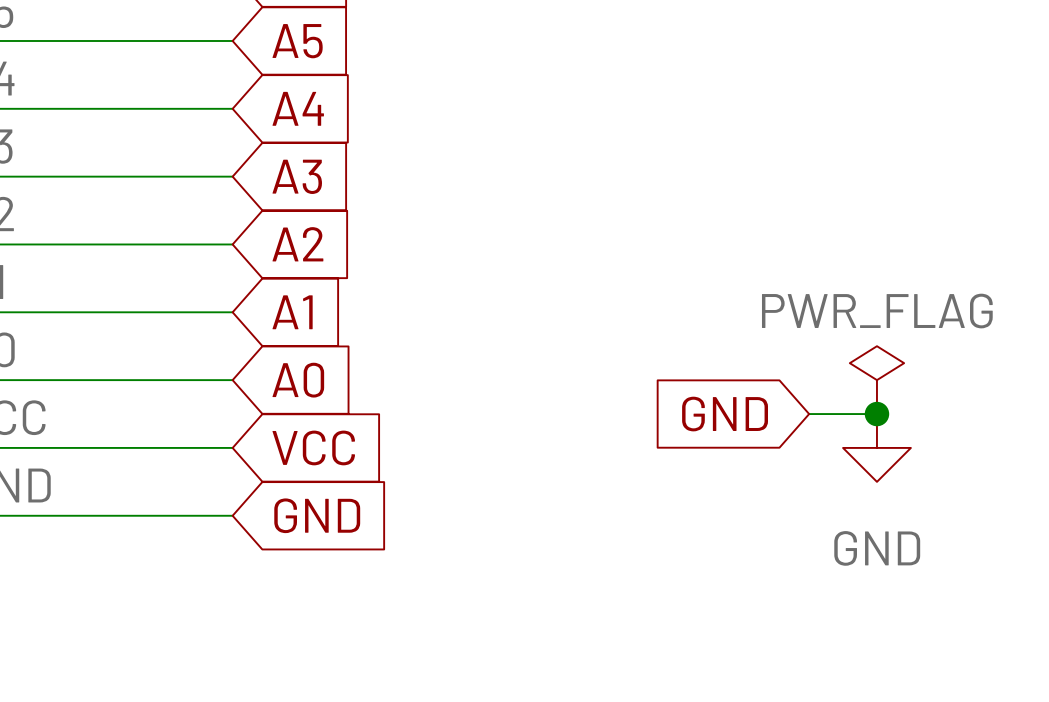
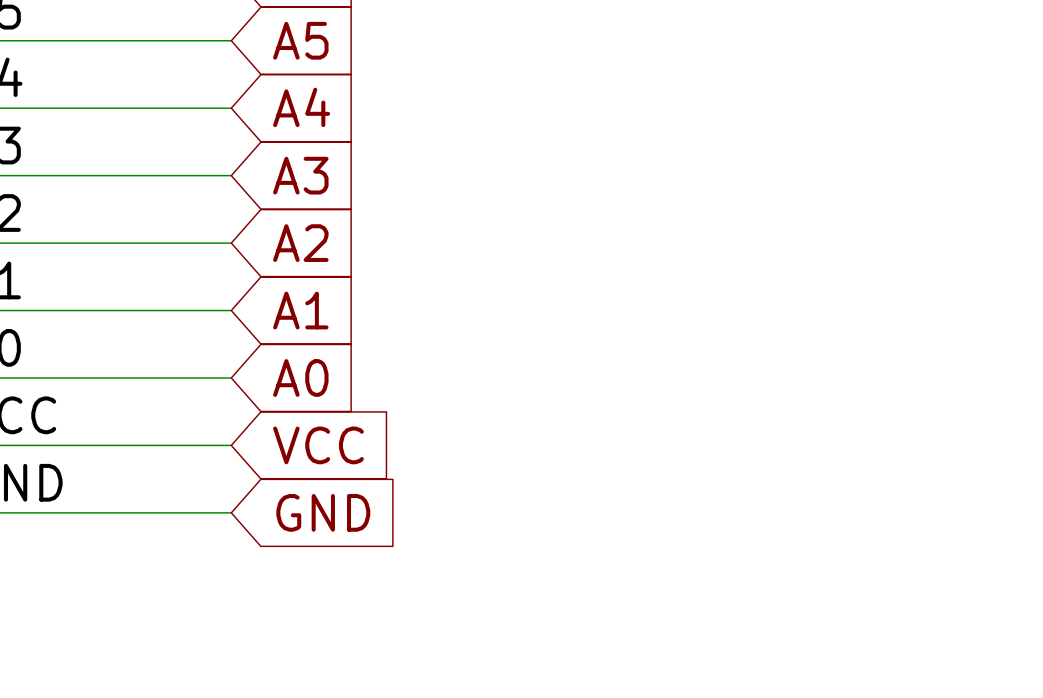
power symbol: PWR_FLAG (876, 380) -> none
global label: GND (725, 414) -> none
wire: (809, 414) (876, 414) -> none
junction: (876, 414) -> none
power symbol: GND (876, 447) -> none

